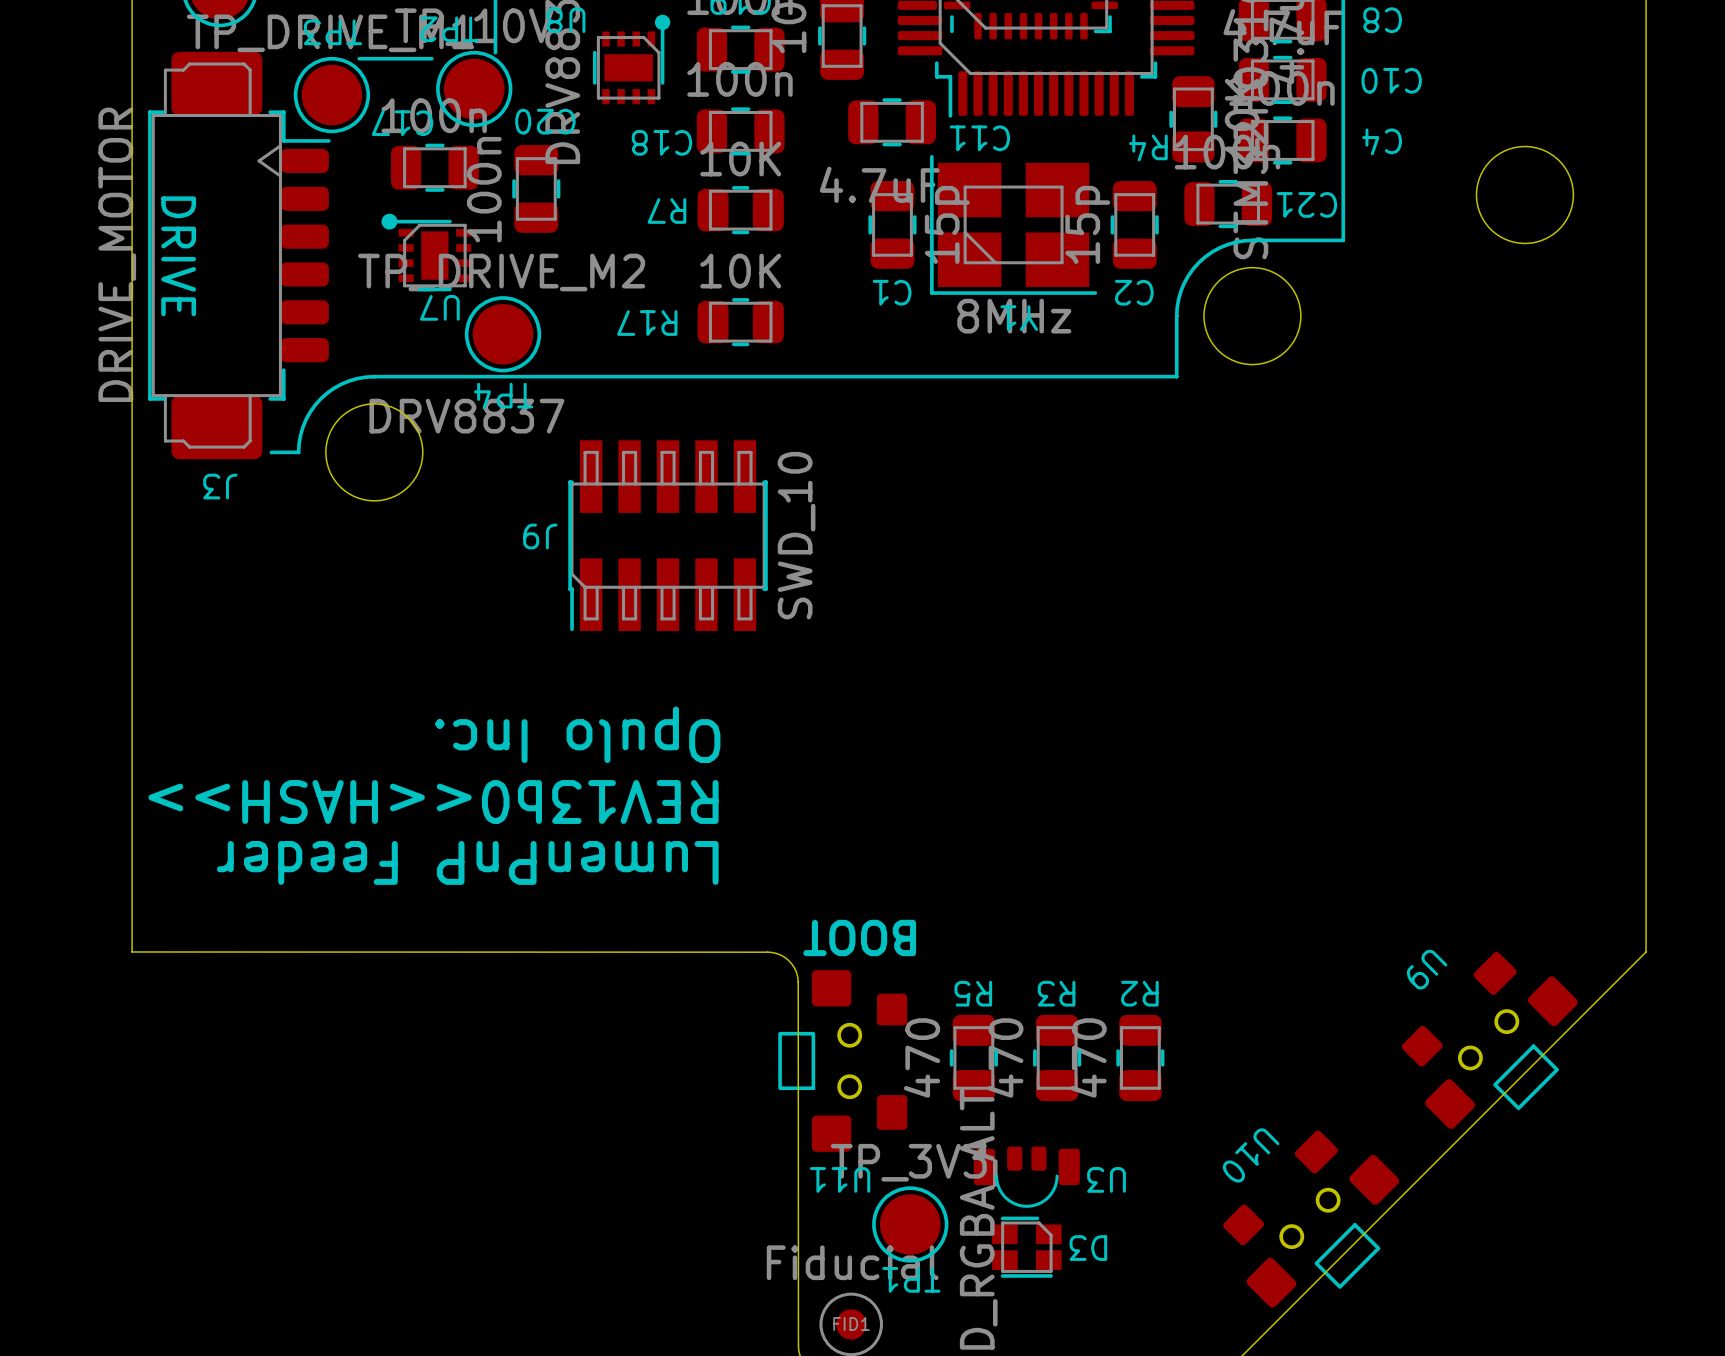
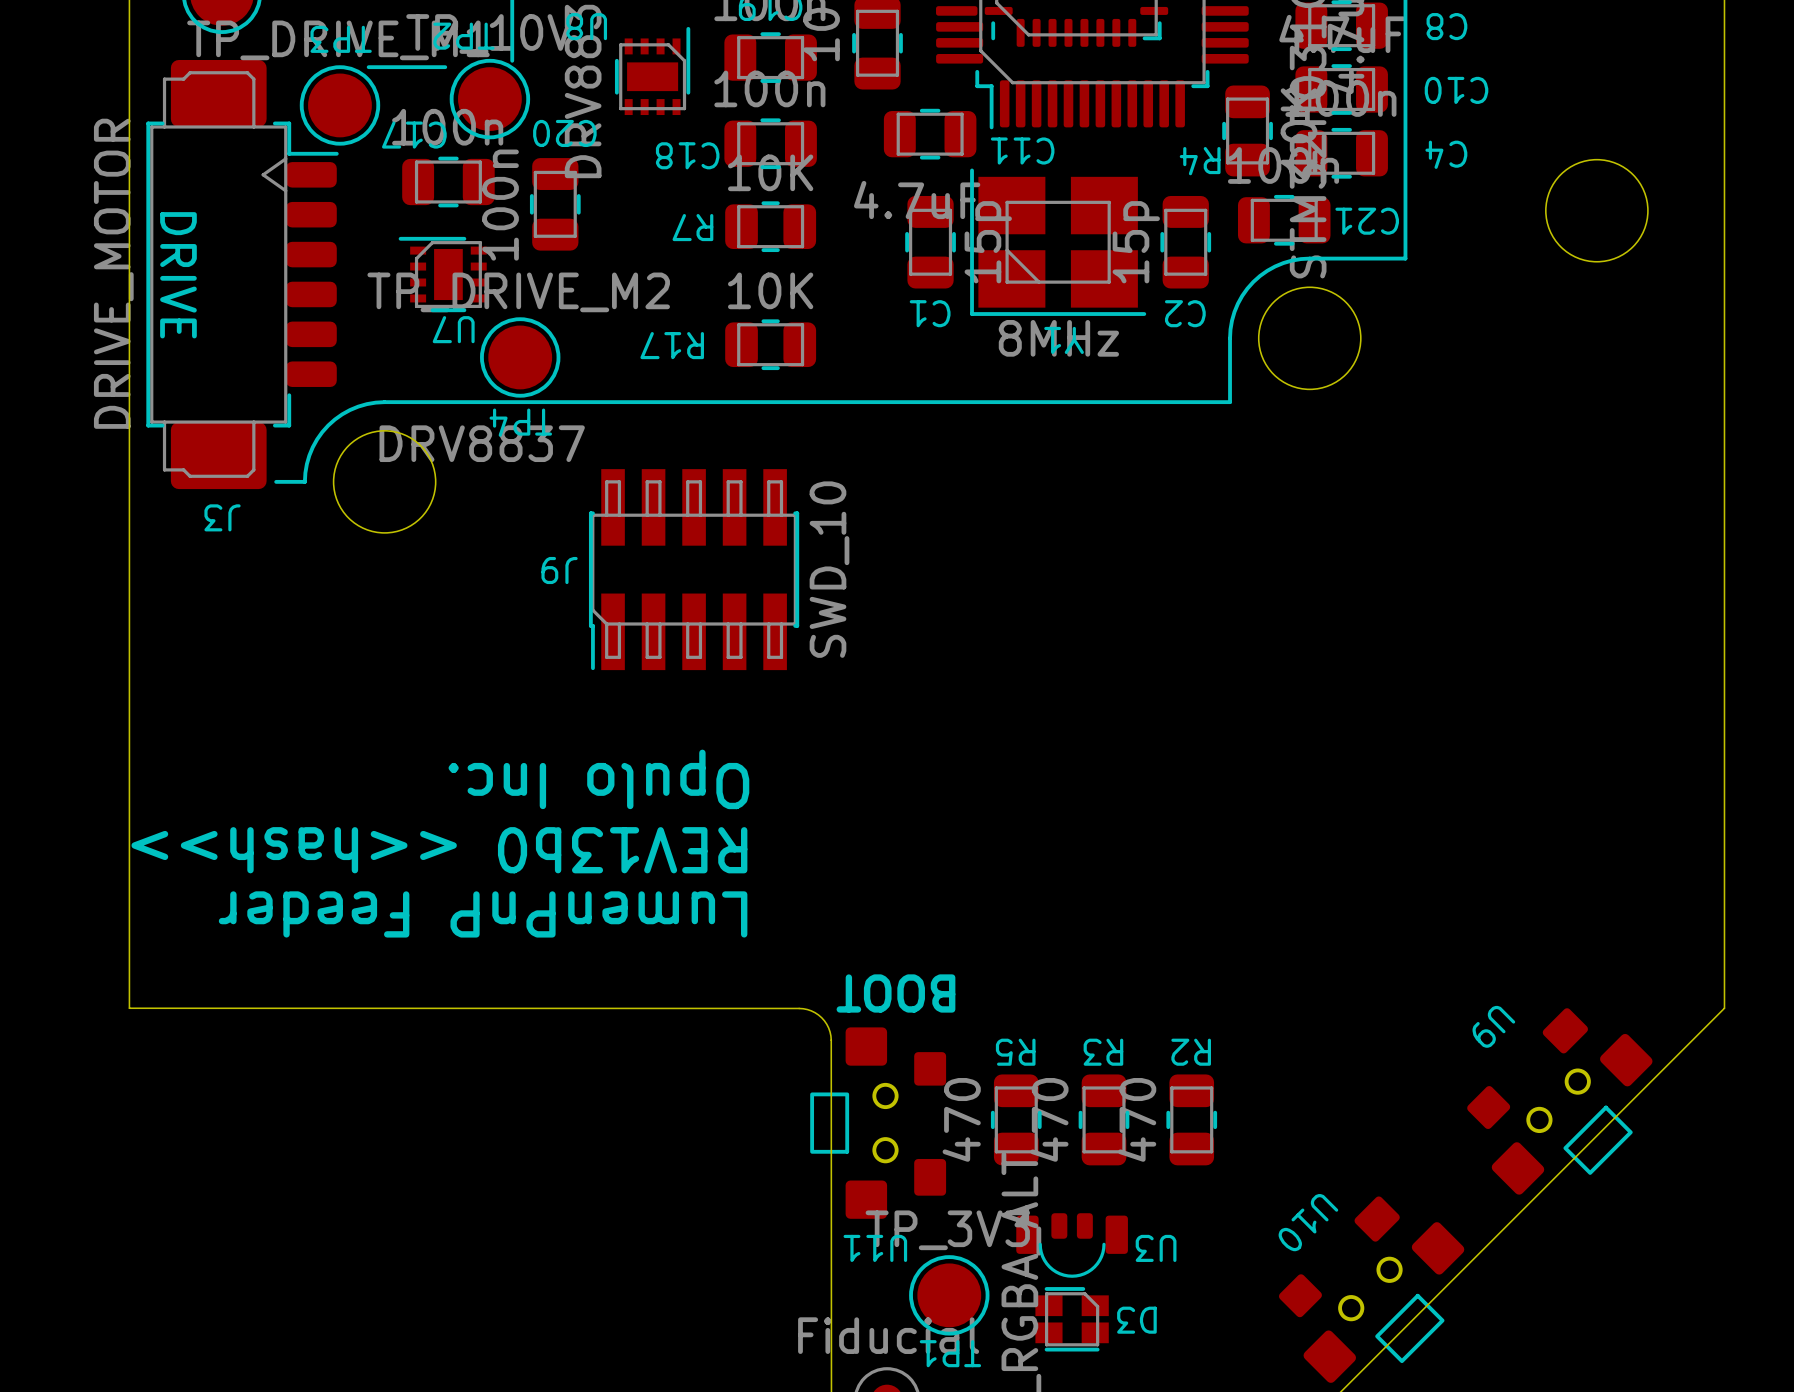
drawing: [654, 14, 671, 31] -> none
drawing: [381, 213, 398, 230] -> none
text: REV13b0<<HASH>> (433, 802) -> REV13b0 <<hash>> (439, 850)

